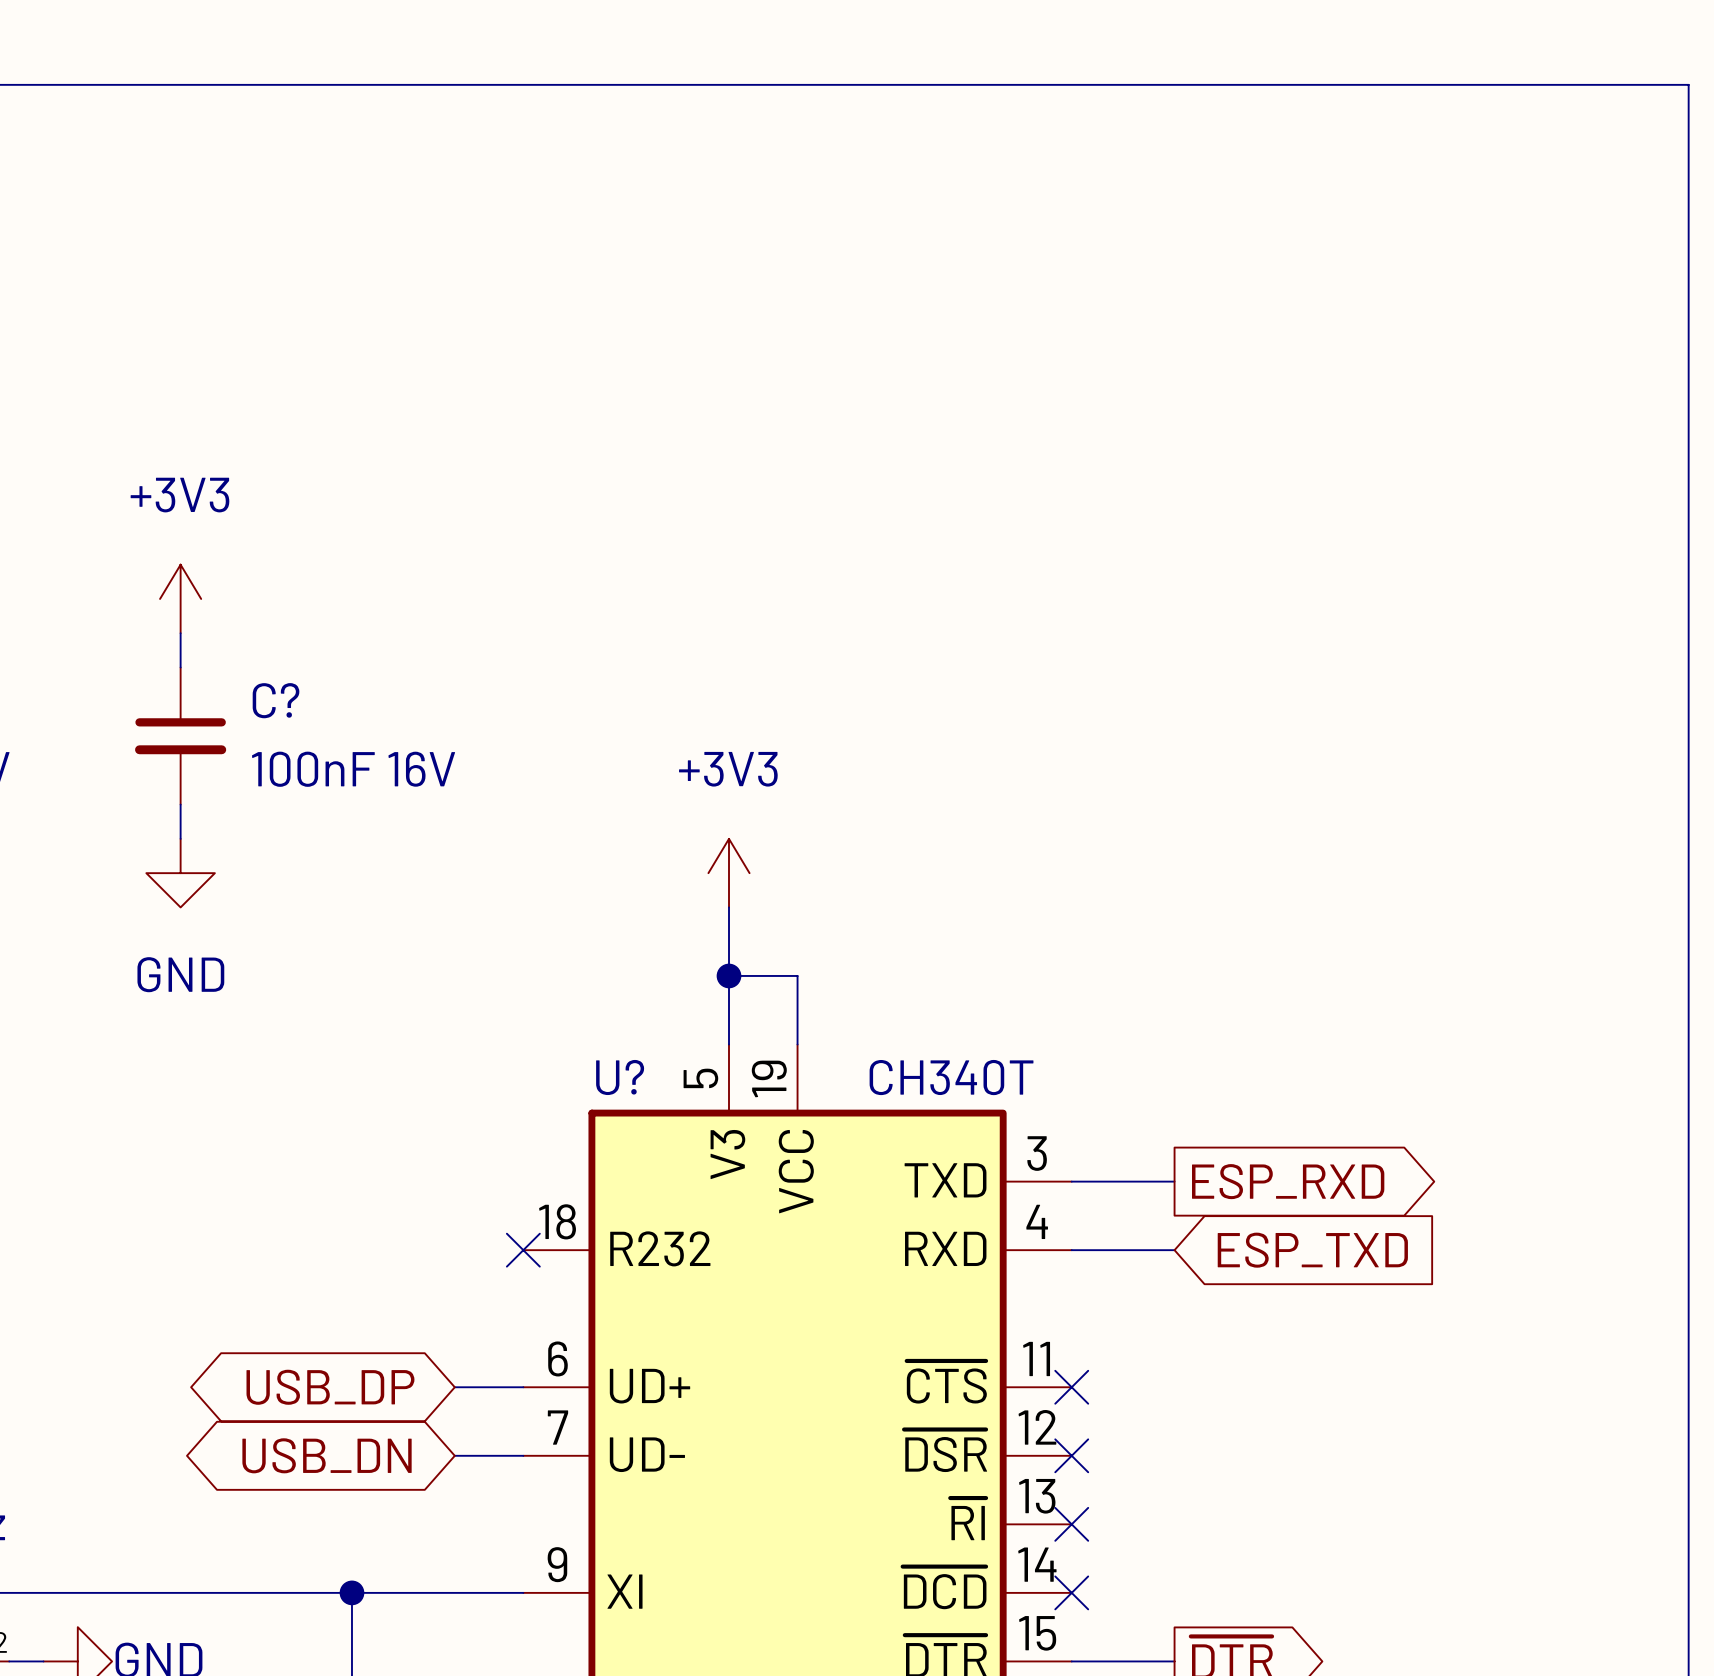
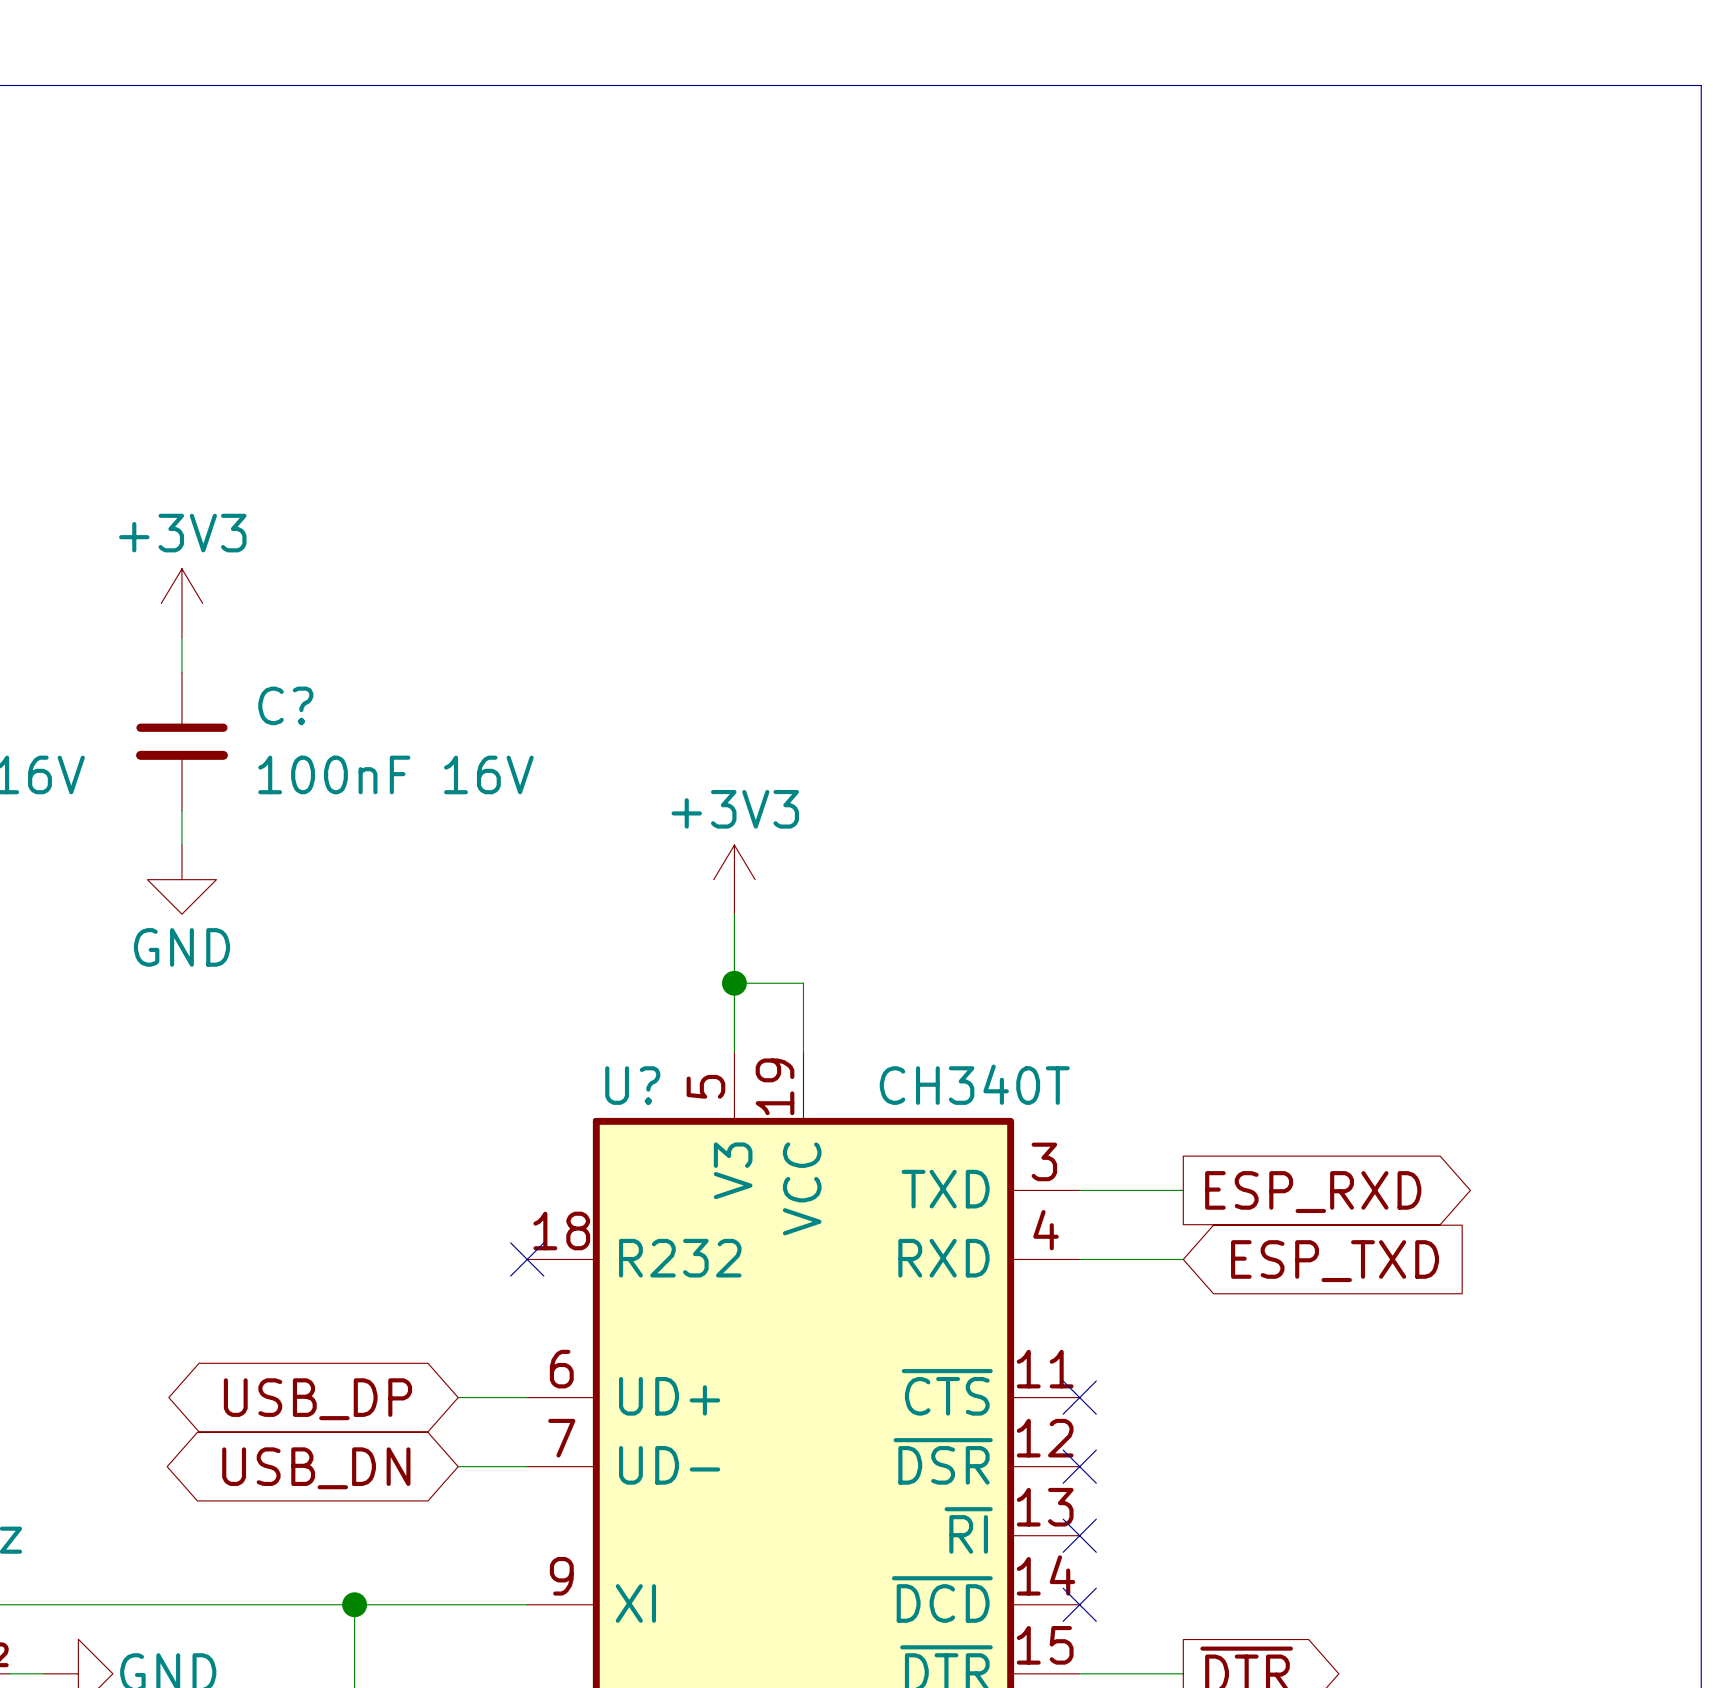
power symbol text position: +3V3 (179, 495) -> +3V3 (182, 533)
power symbol text position: +3V3 (728, 769) -> +3V3 (735, 809)
power symbol text position: GND (180, 974) -> GND (181, 947)

